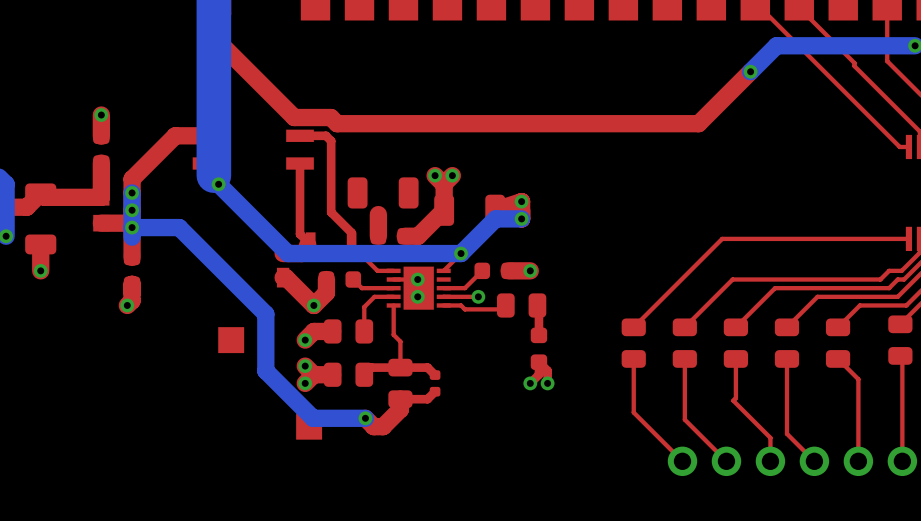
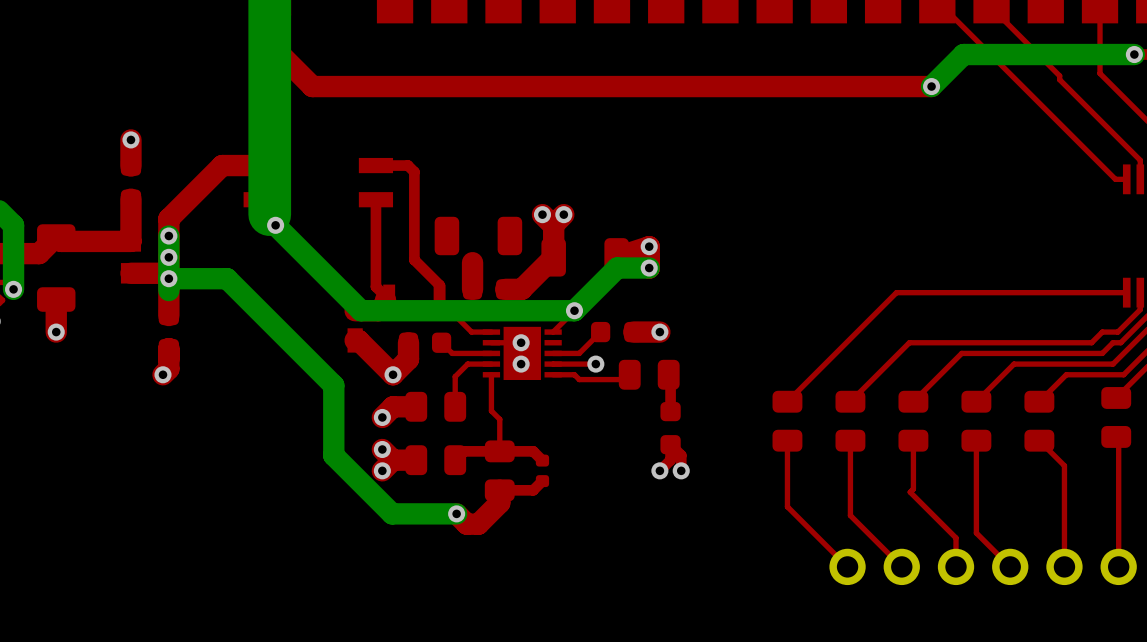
top track: (750, 71) (698, 123) (337, 123) (330, 117) (294, 117) (248, 71) -> (931, 86) (312, 86)
part: (231, 340) -> none
part: (309, 426) -> none

